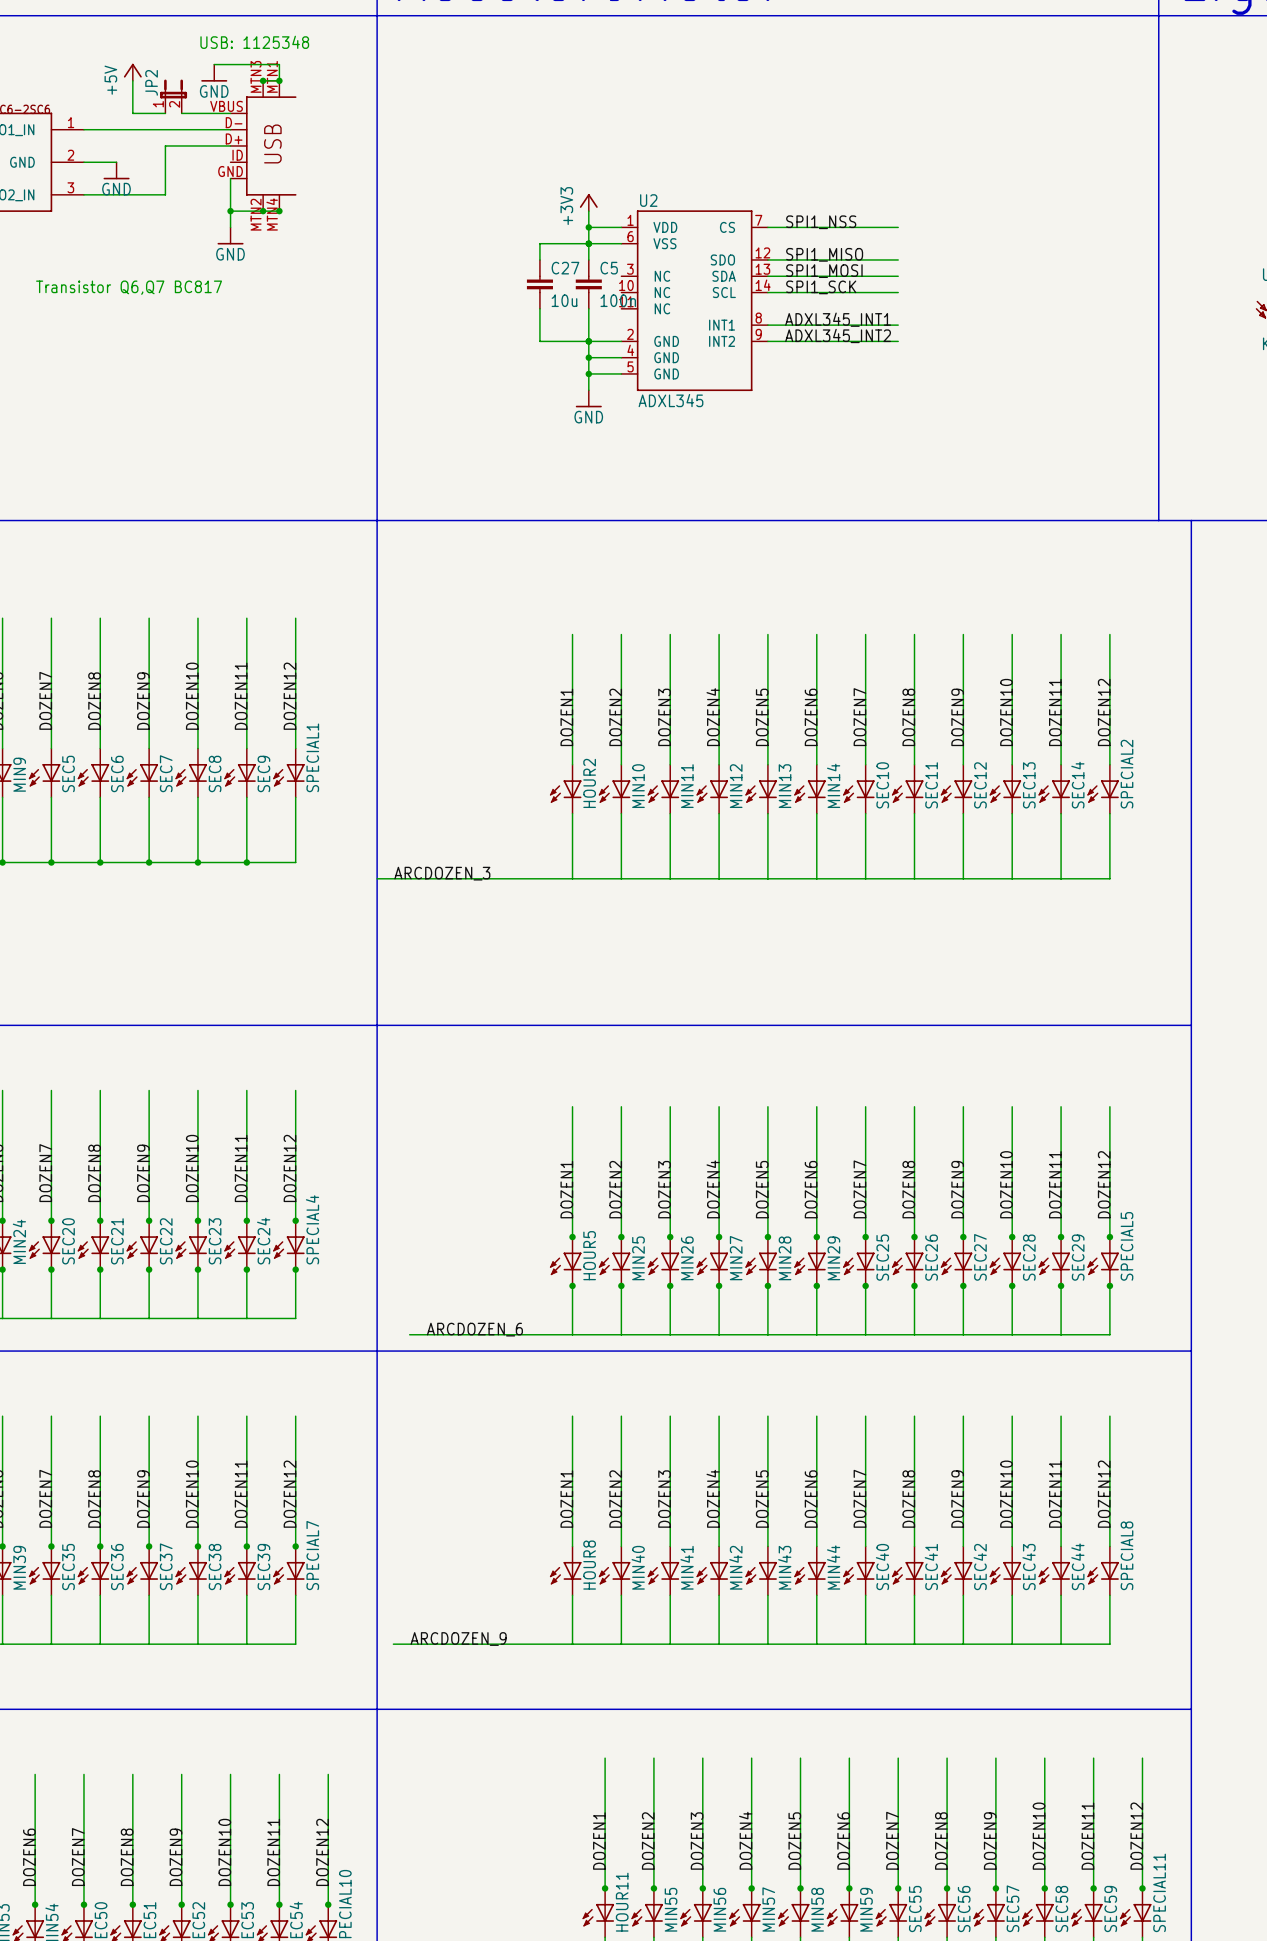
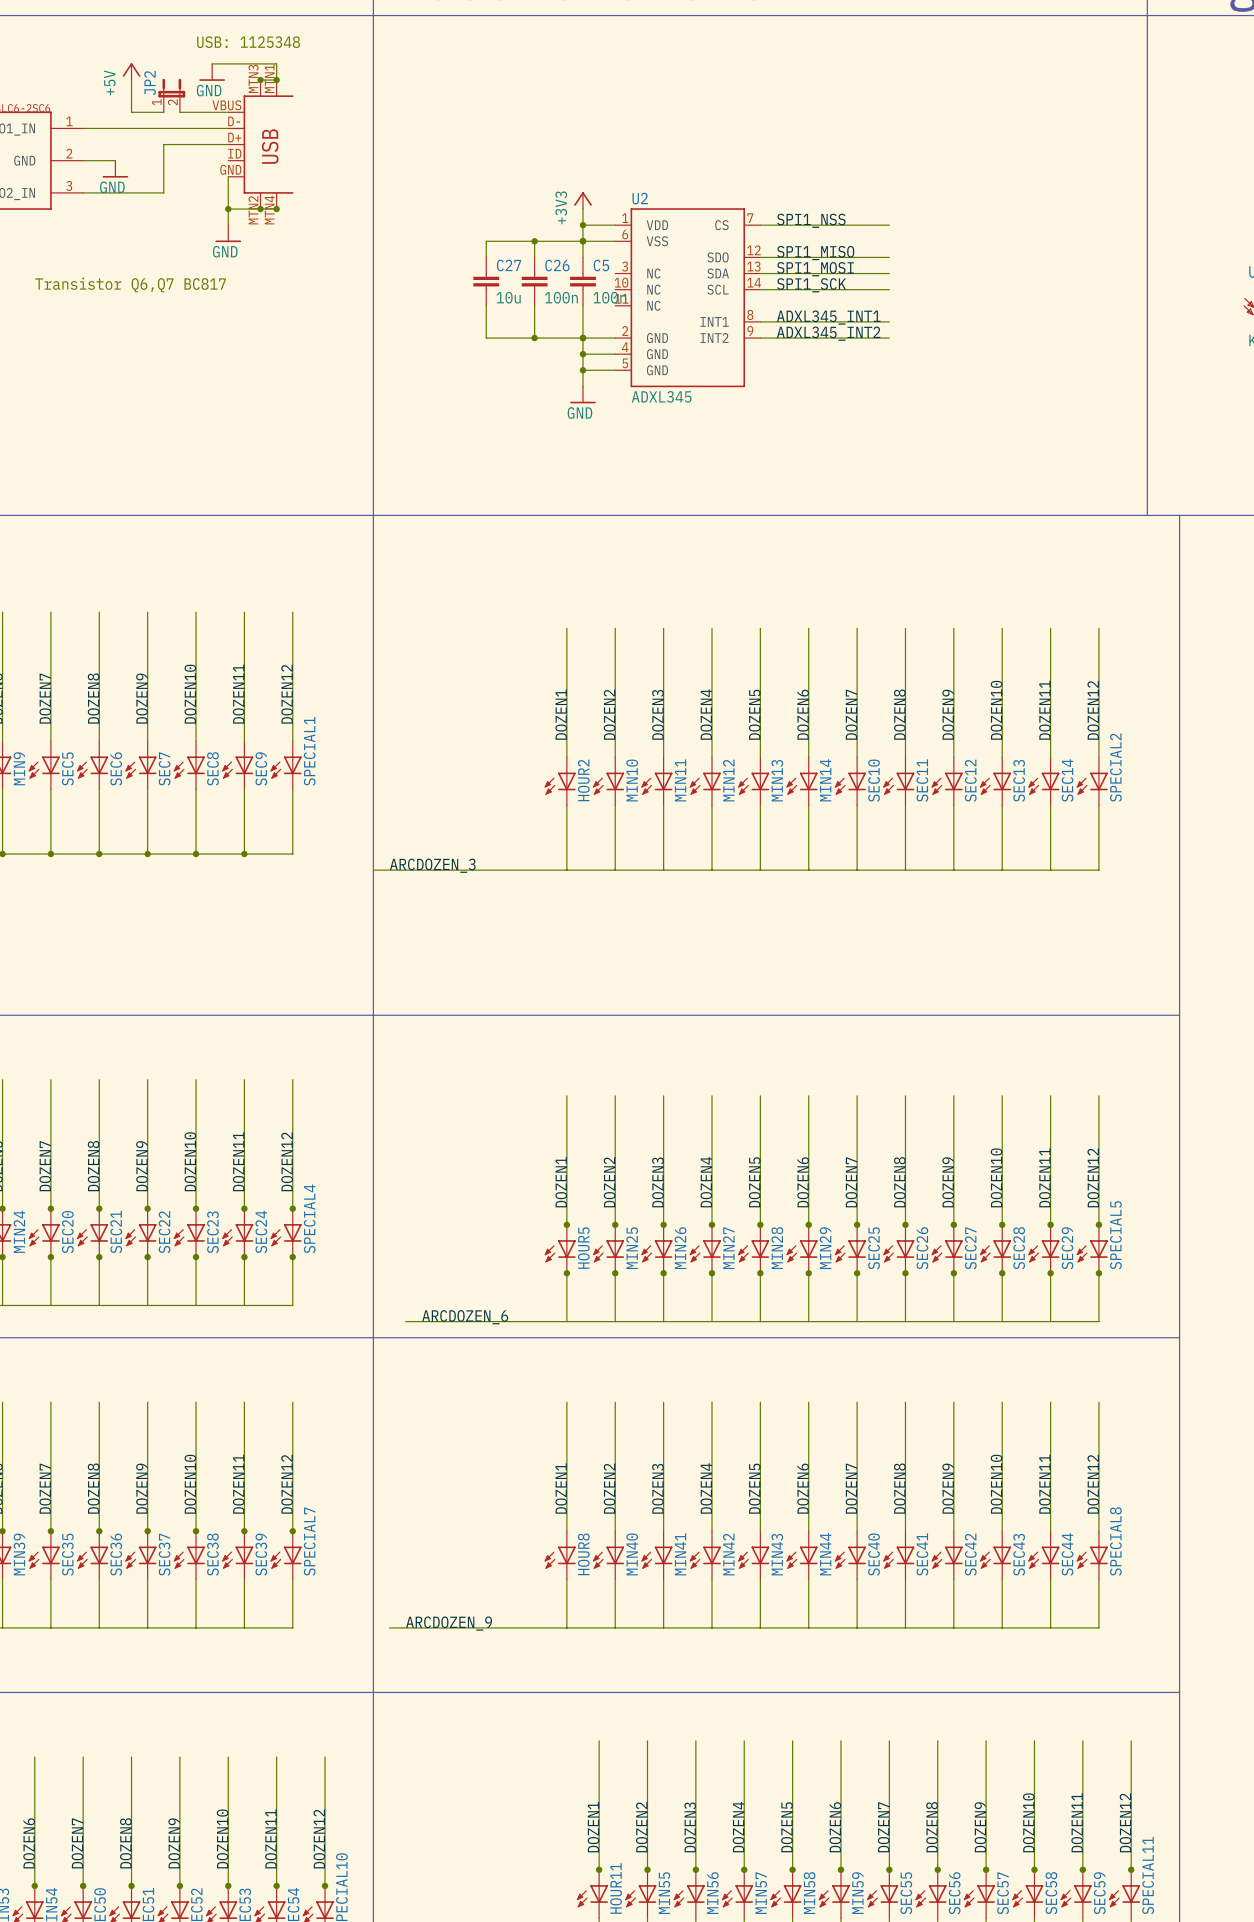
wire: none -> (534, 241) (486, 241) (486, 257)
junction: none -> (534, 241)
C27 name: C27 (565, 268) -> C26 (557, 265)
C27: none -> 10u (486, 281)
C27 value: 10u (564, 300) -> 100n (561, 297)
wire: none -> (486, 305) (486, 338) (534, 338)
junction: none -> (534, 338)

